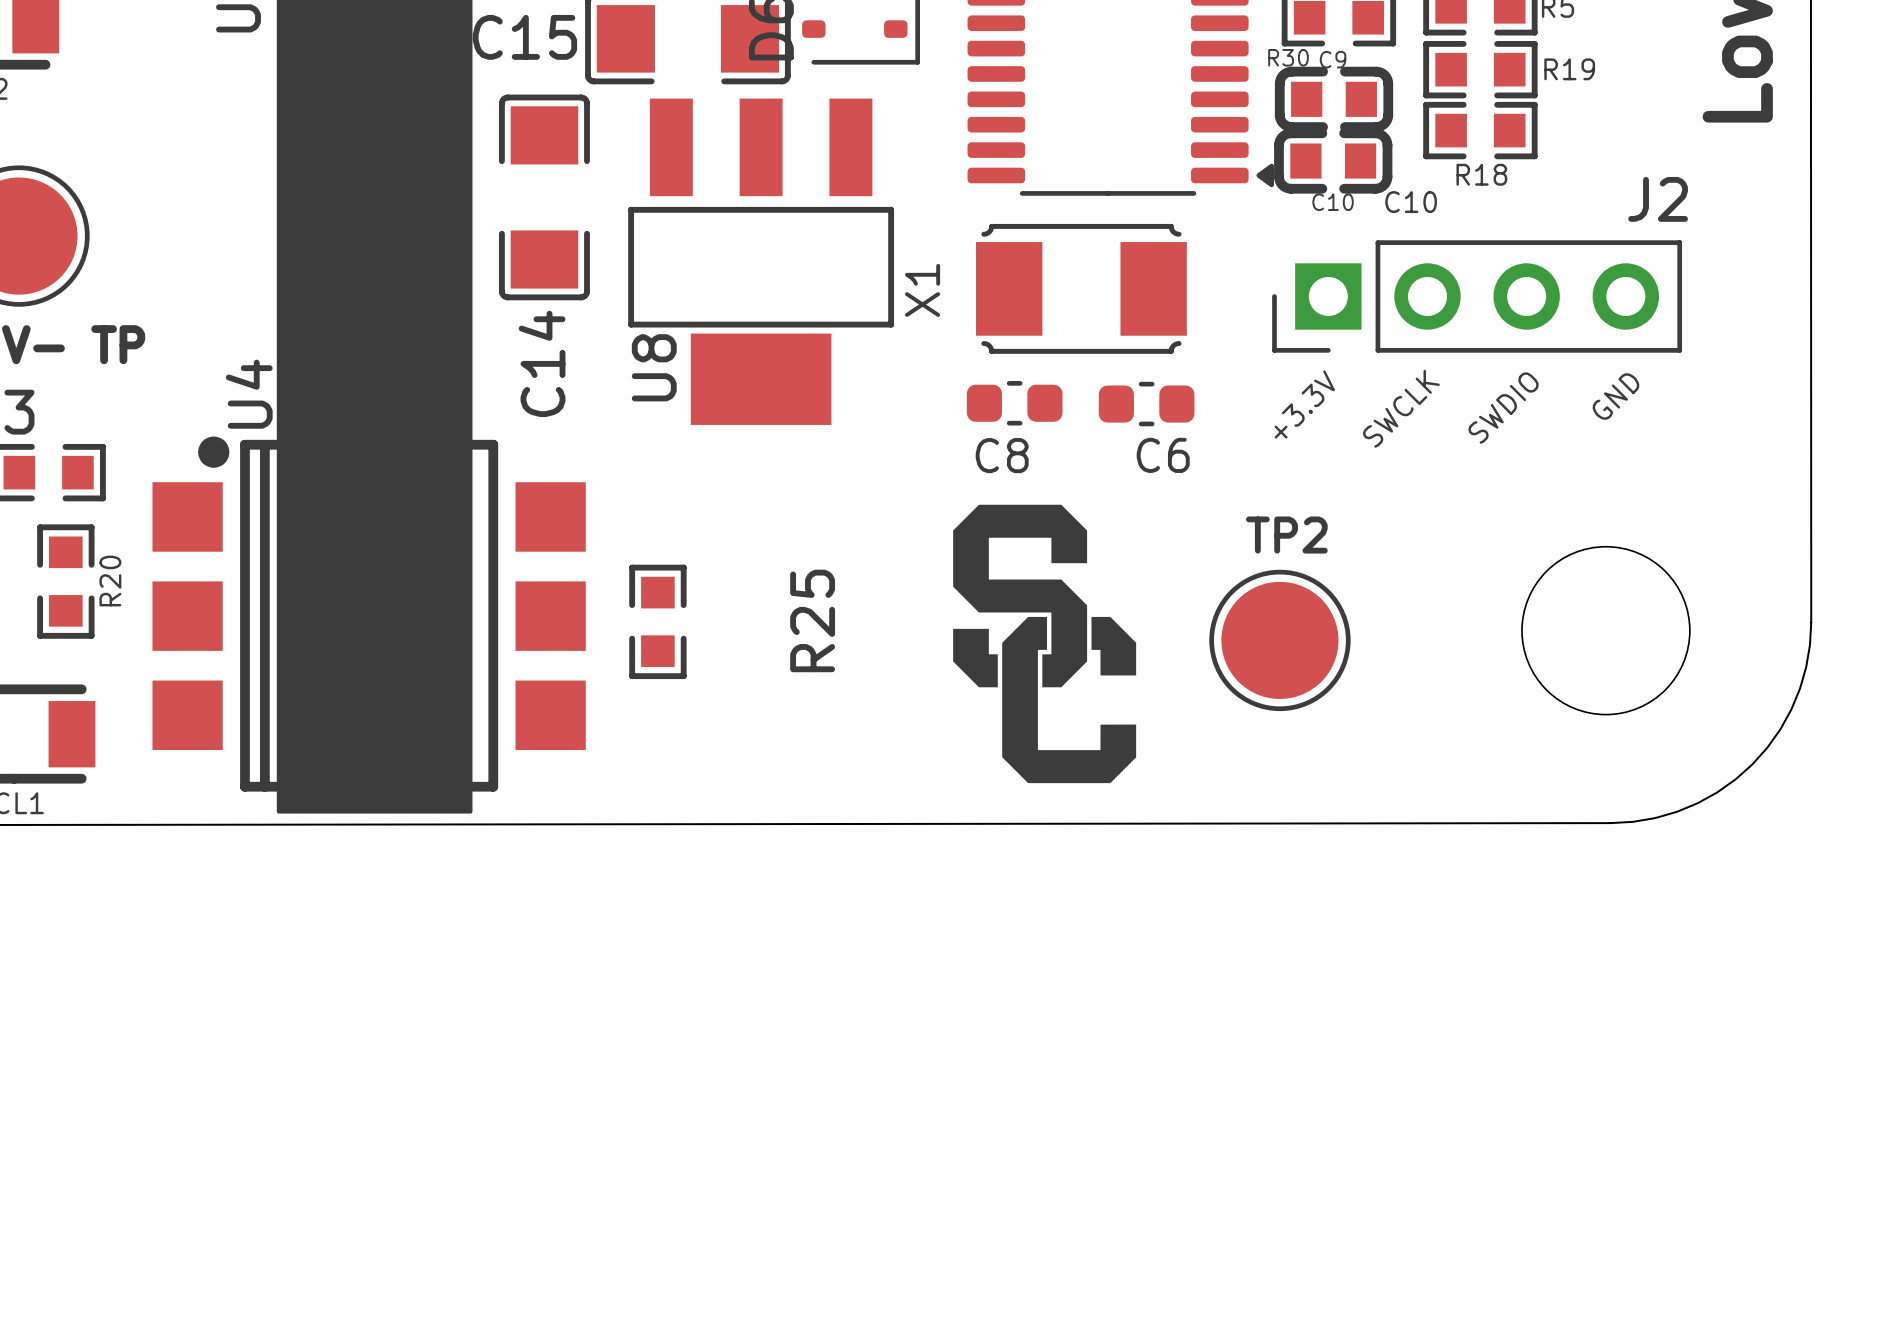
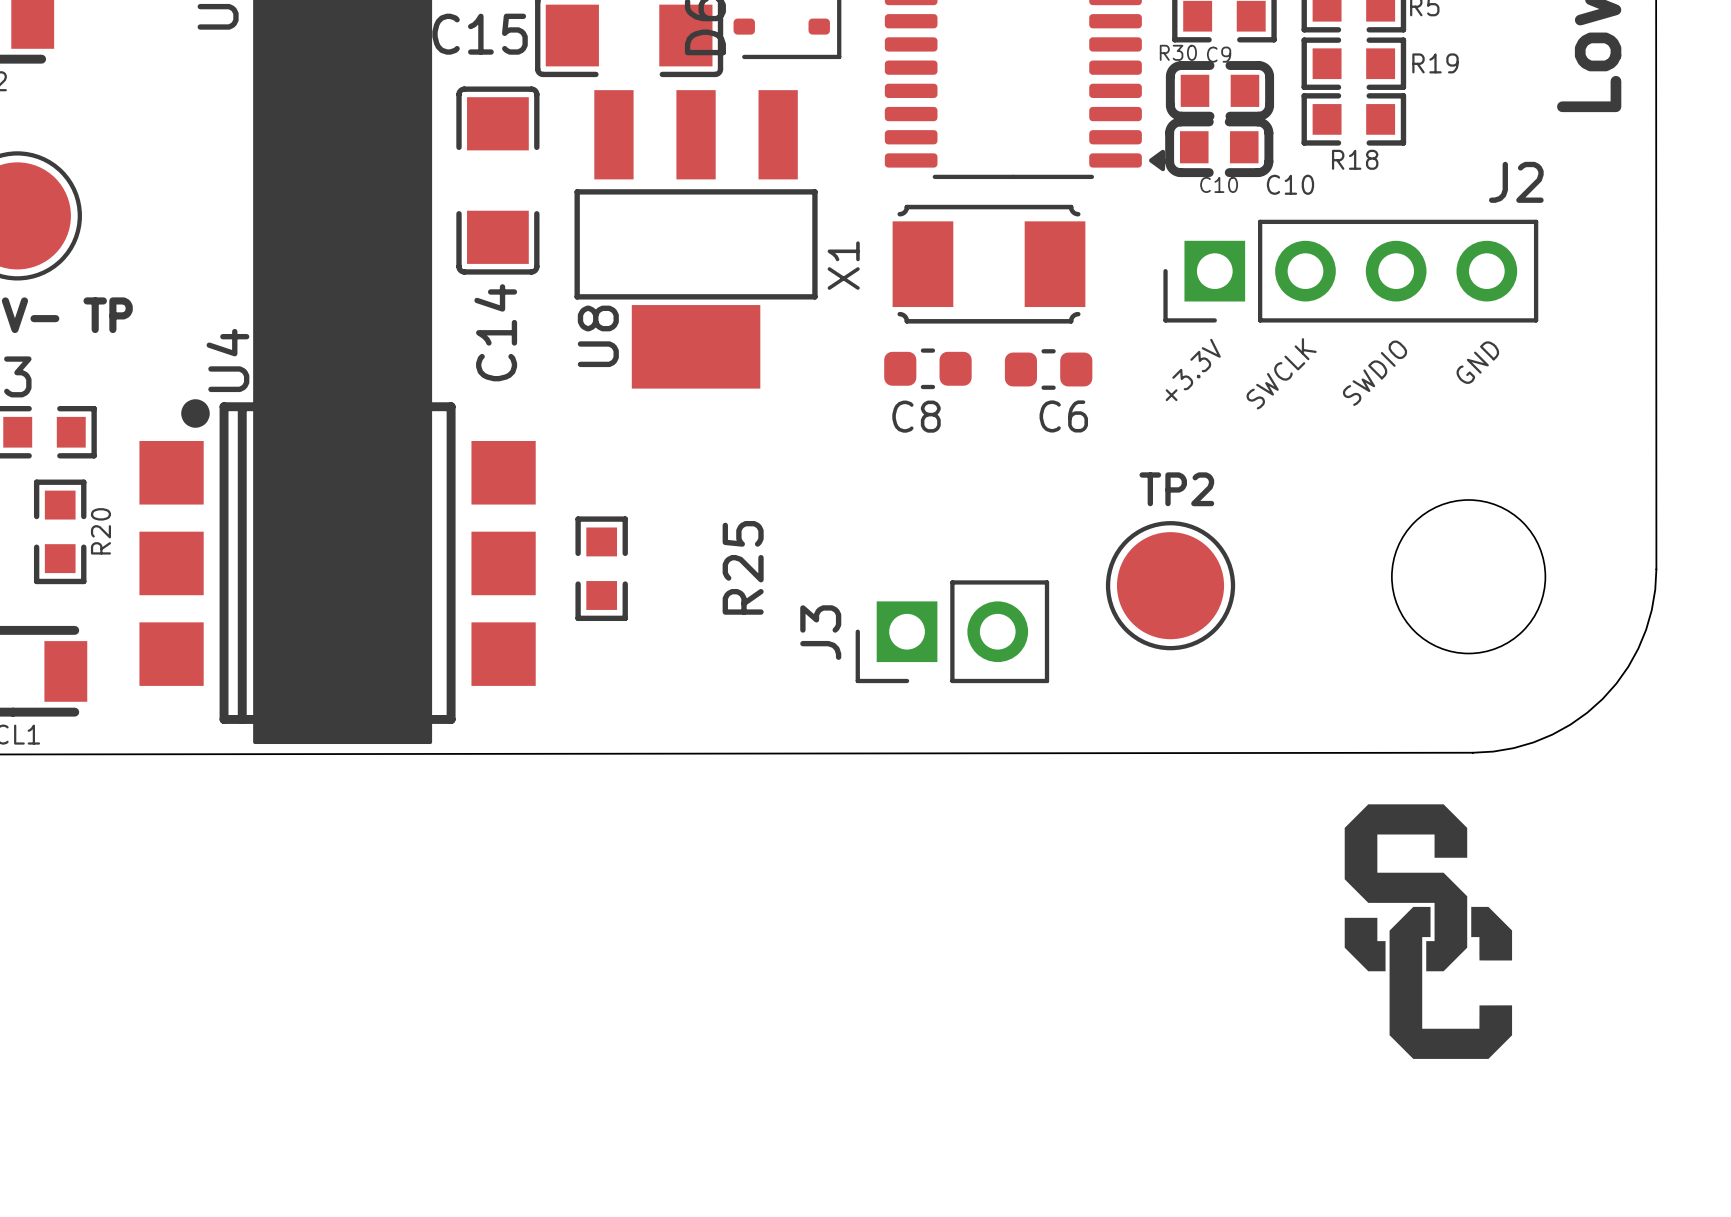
drawing position: (1044, 643) -> (1428, 931)
J3: none -> (952, 631)

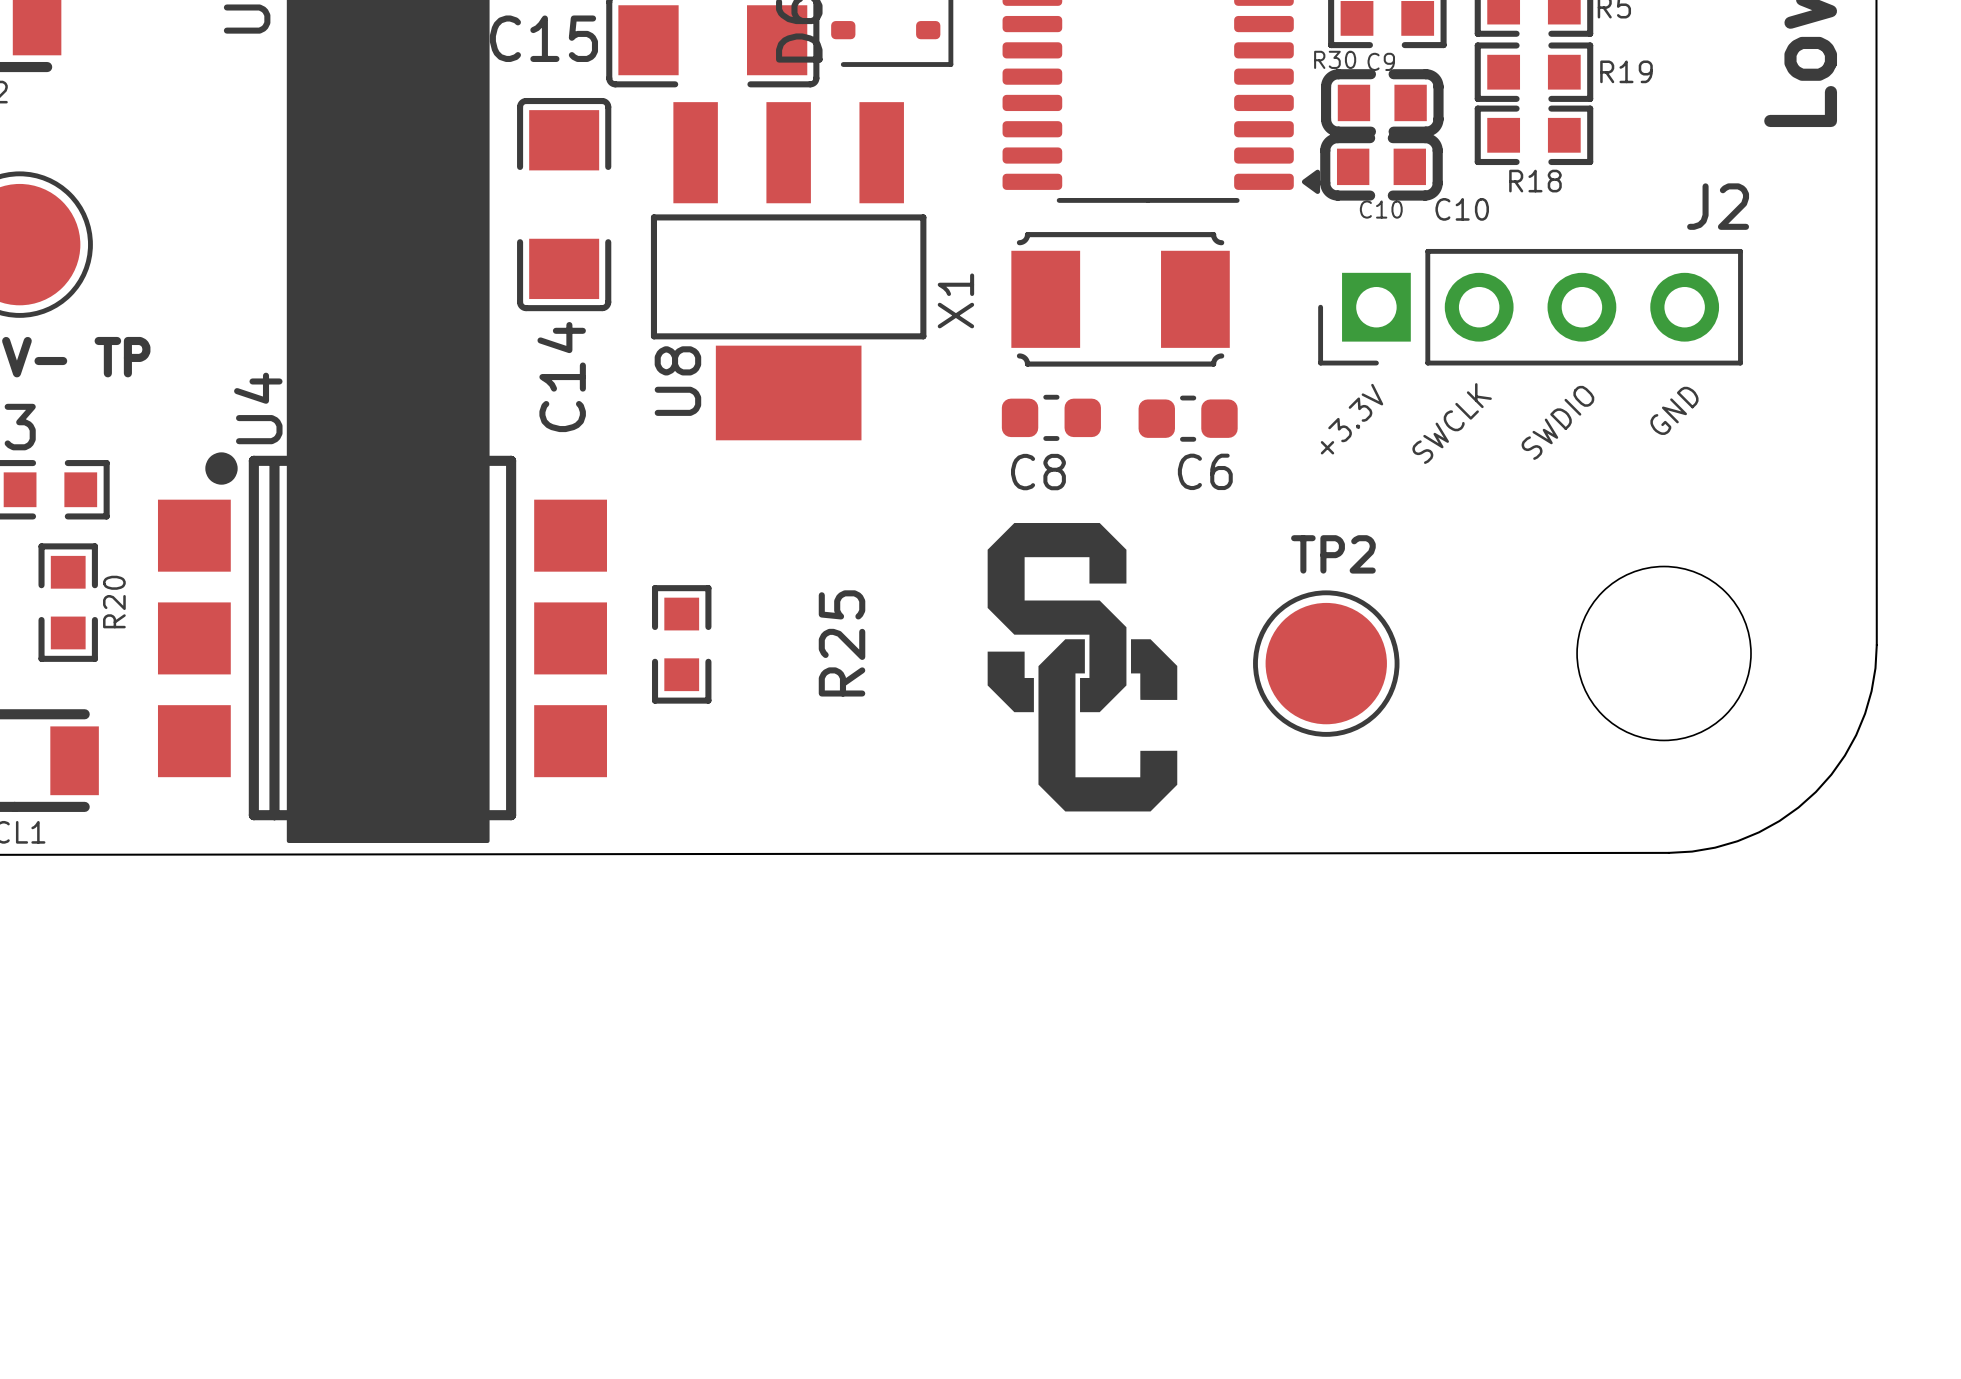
J3: (952, 631) -> none
drawing position: (1428, 931) -> (1082, 667)

